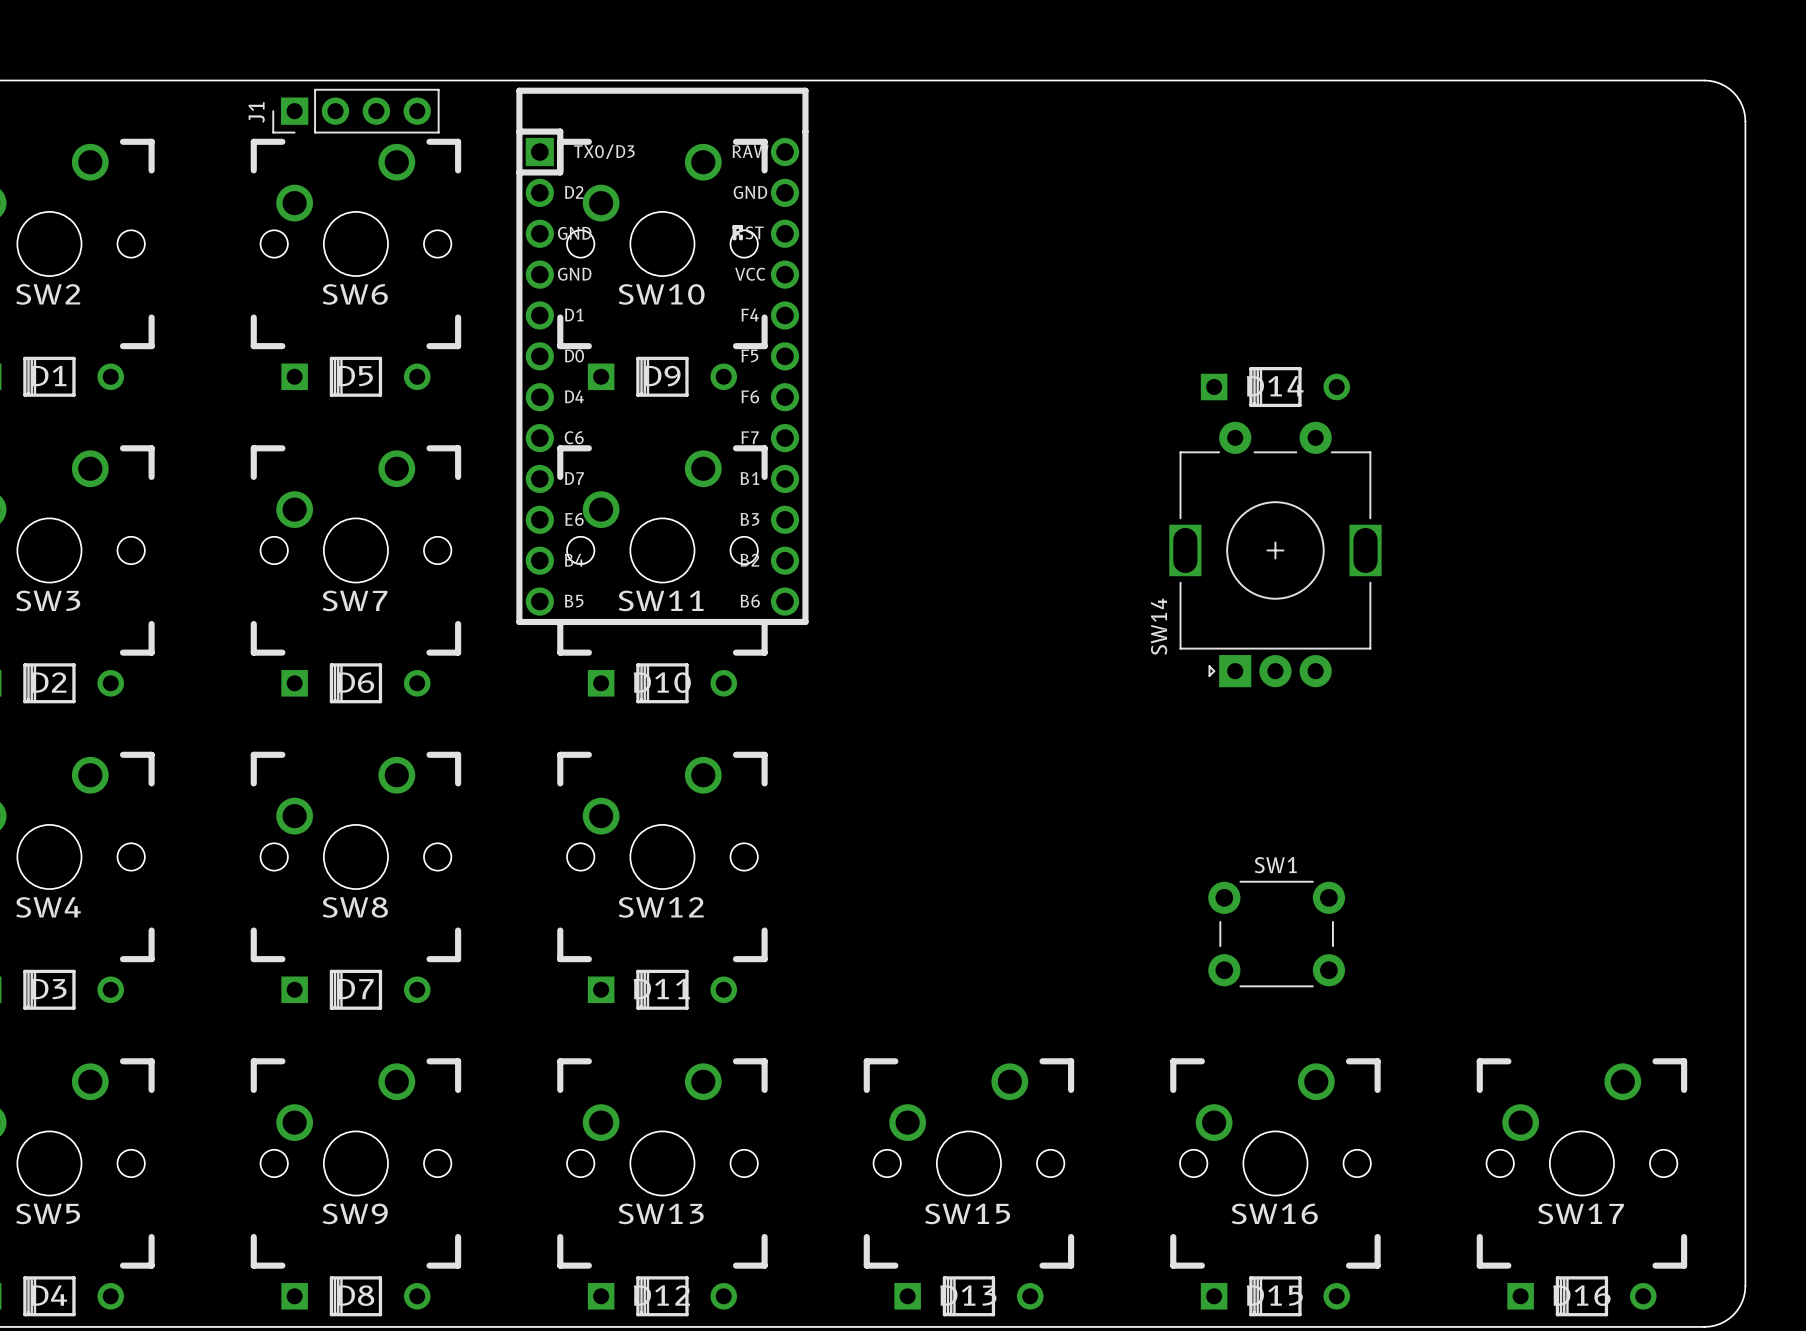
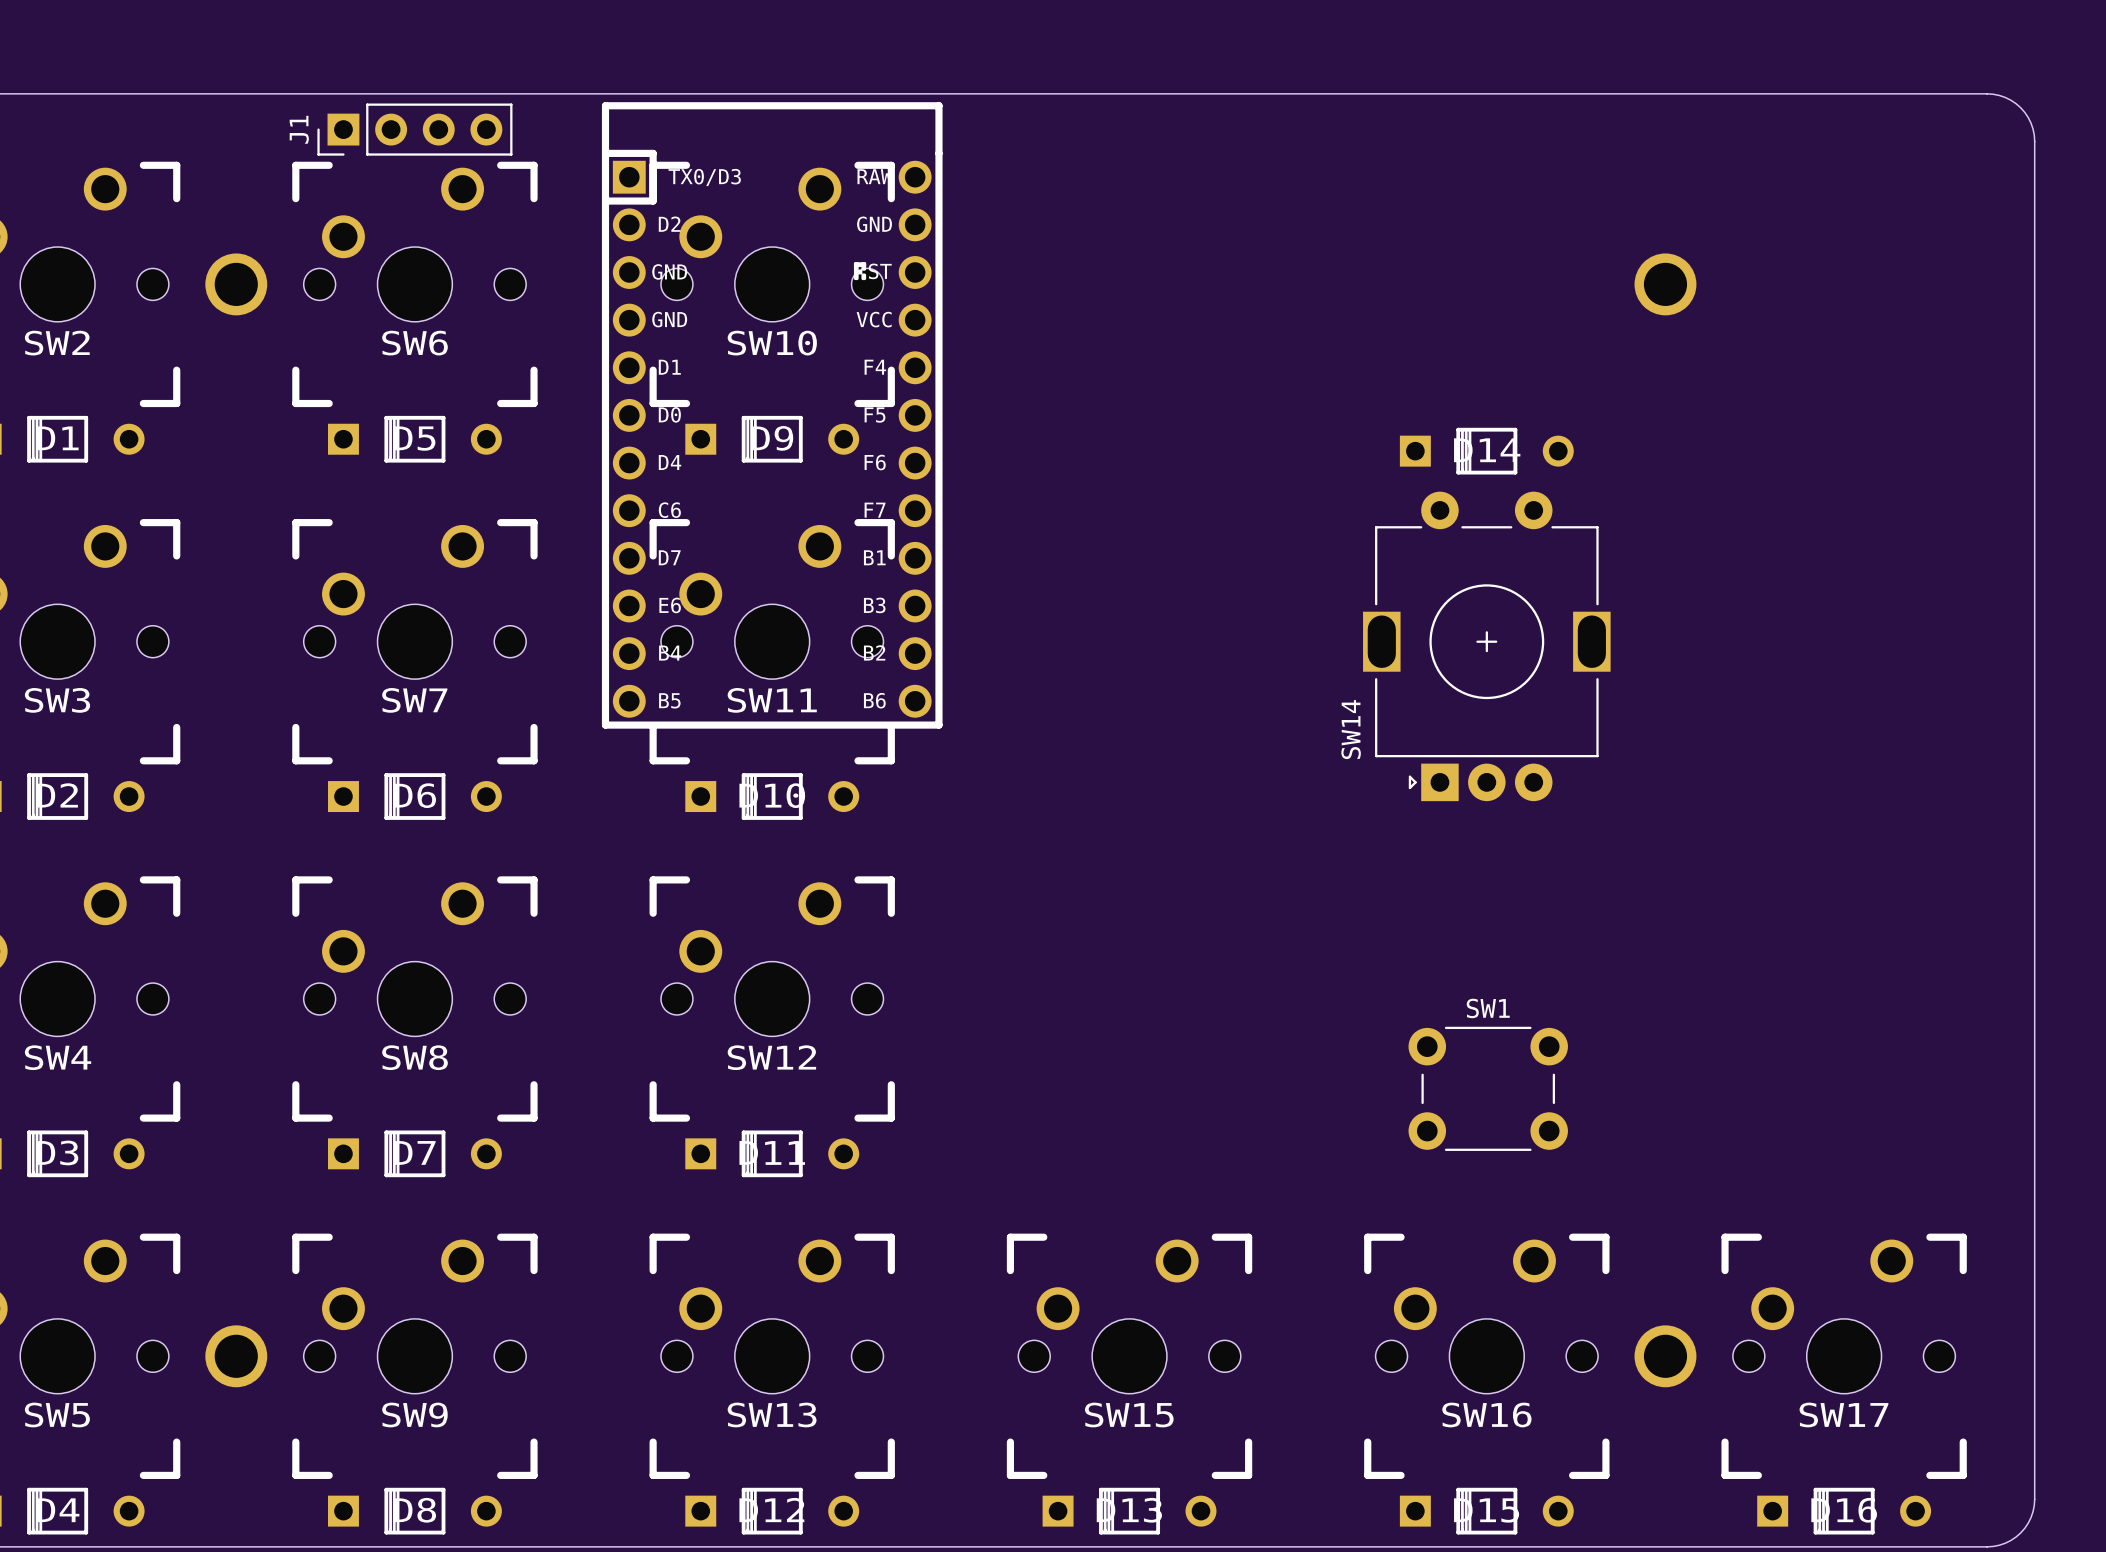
part: none -> (236, 284)
part: none -> (1665, 284)
part: none -> (236, 1356)
part: none -> (1665, 1356)

